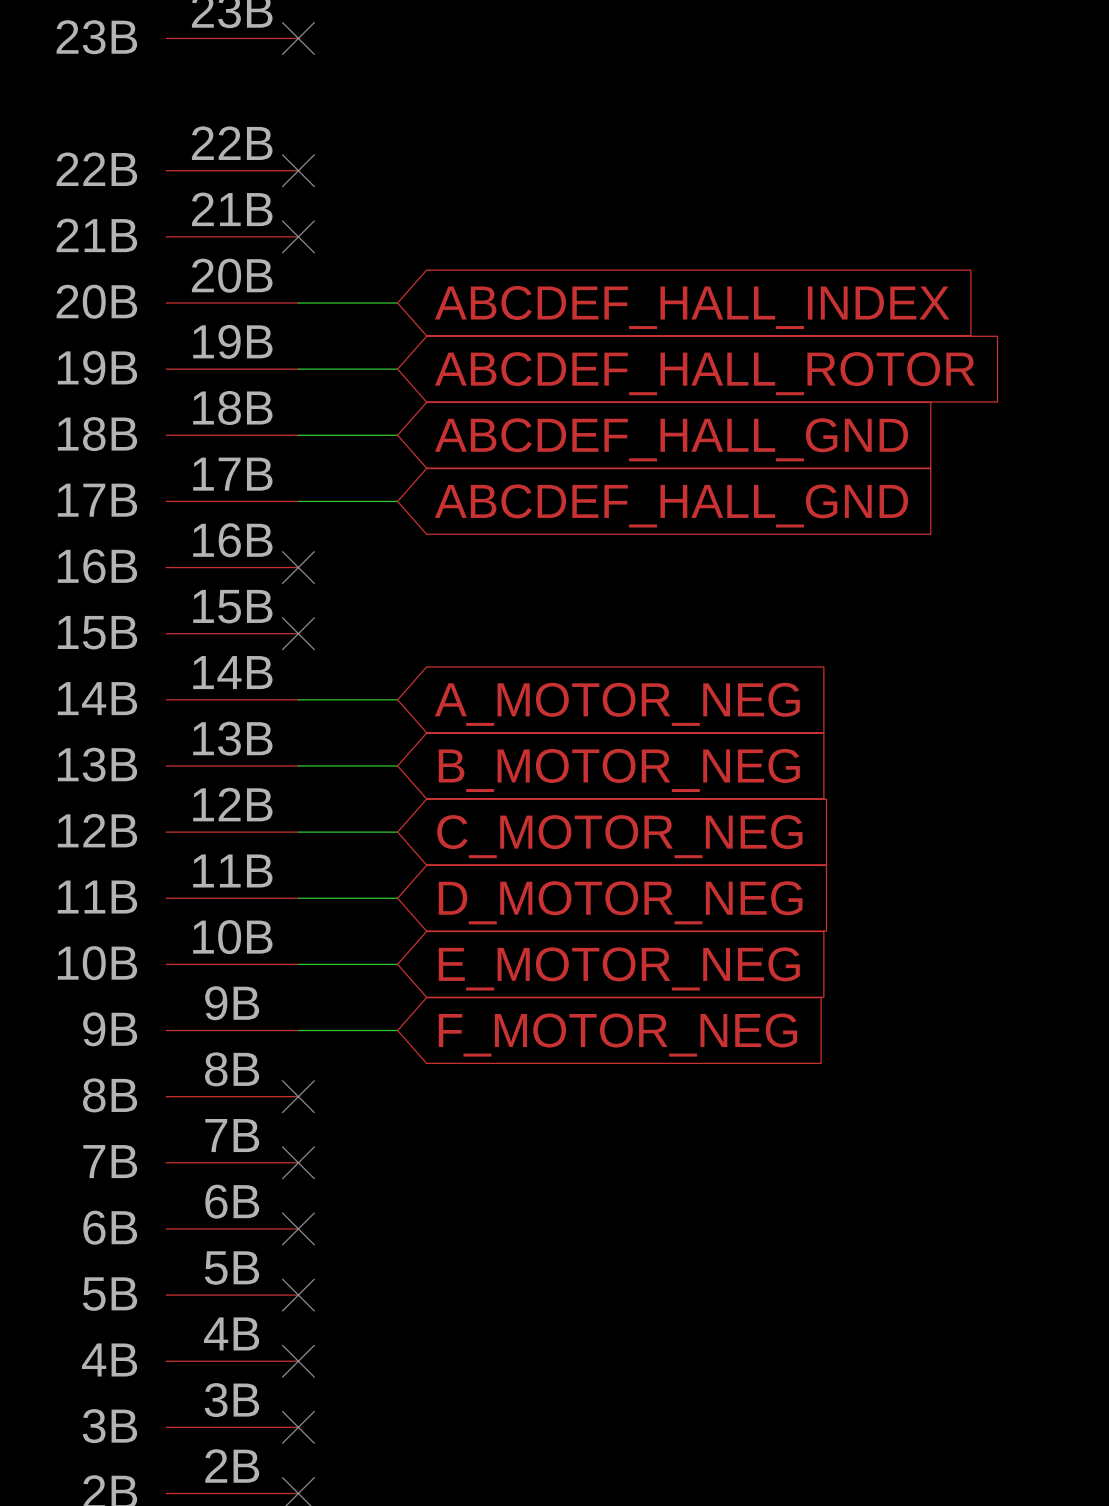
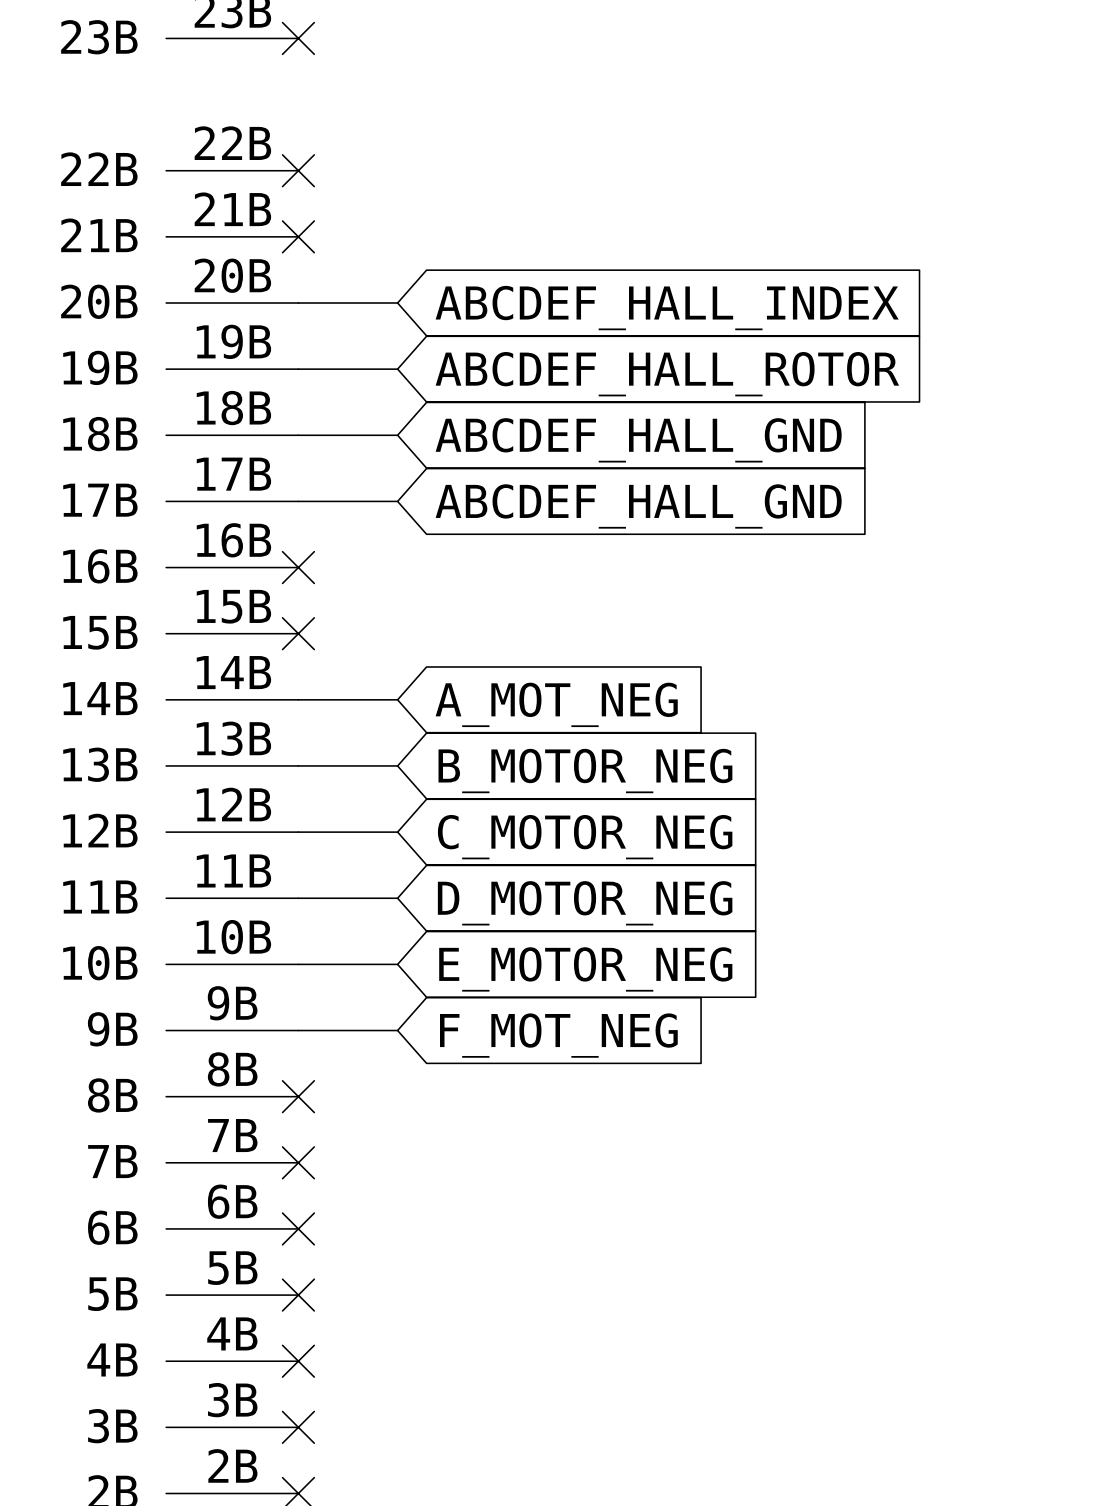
global label: A_MOTOR_NEG (617, 704) -> A_MOT_NEG (556, 704)
global label: F_MOTOR_NEG (617, 1035) -> F_MOT_NEG (558, 1035)

